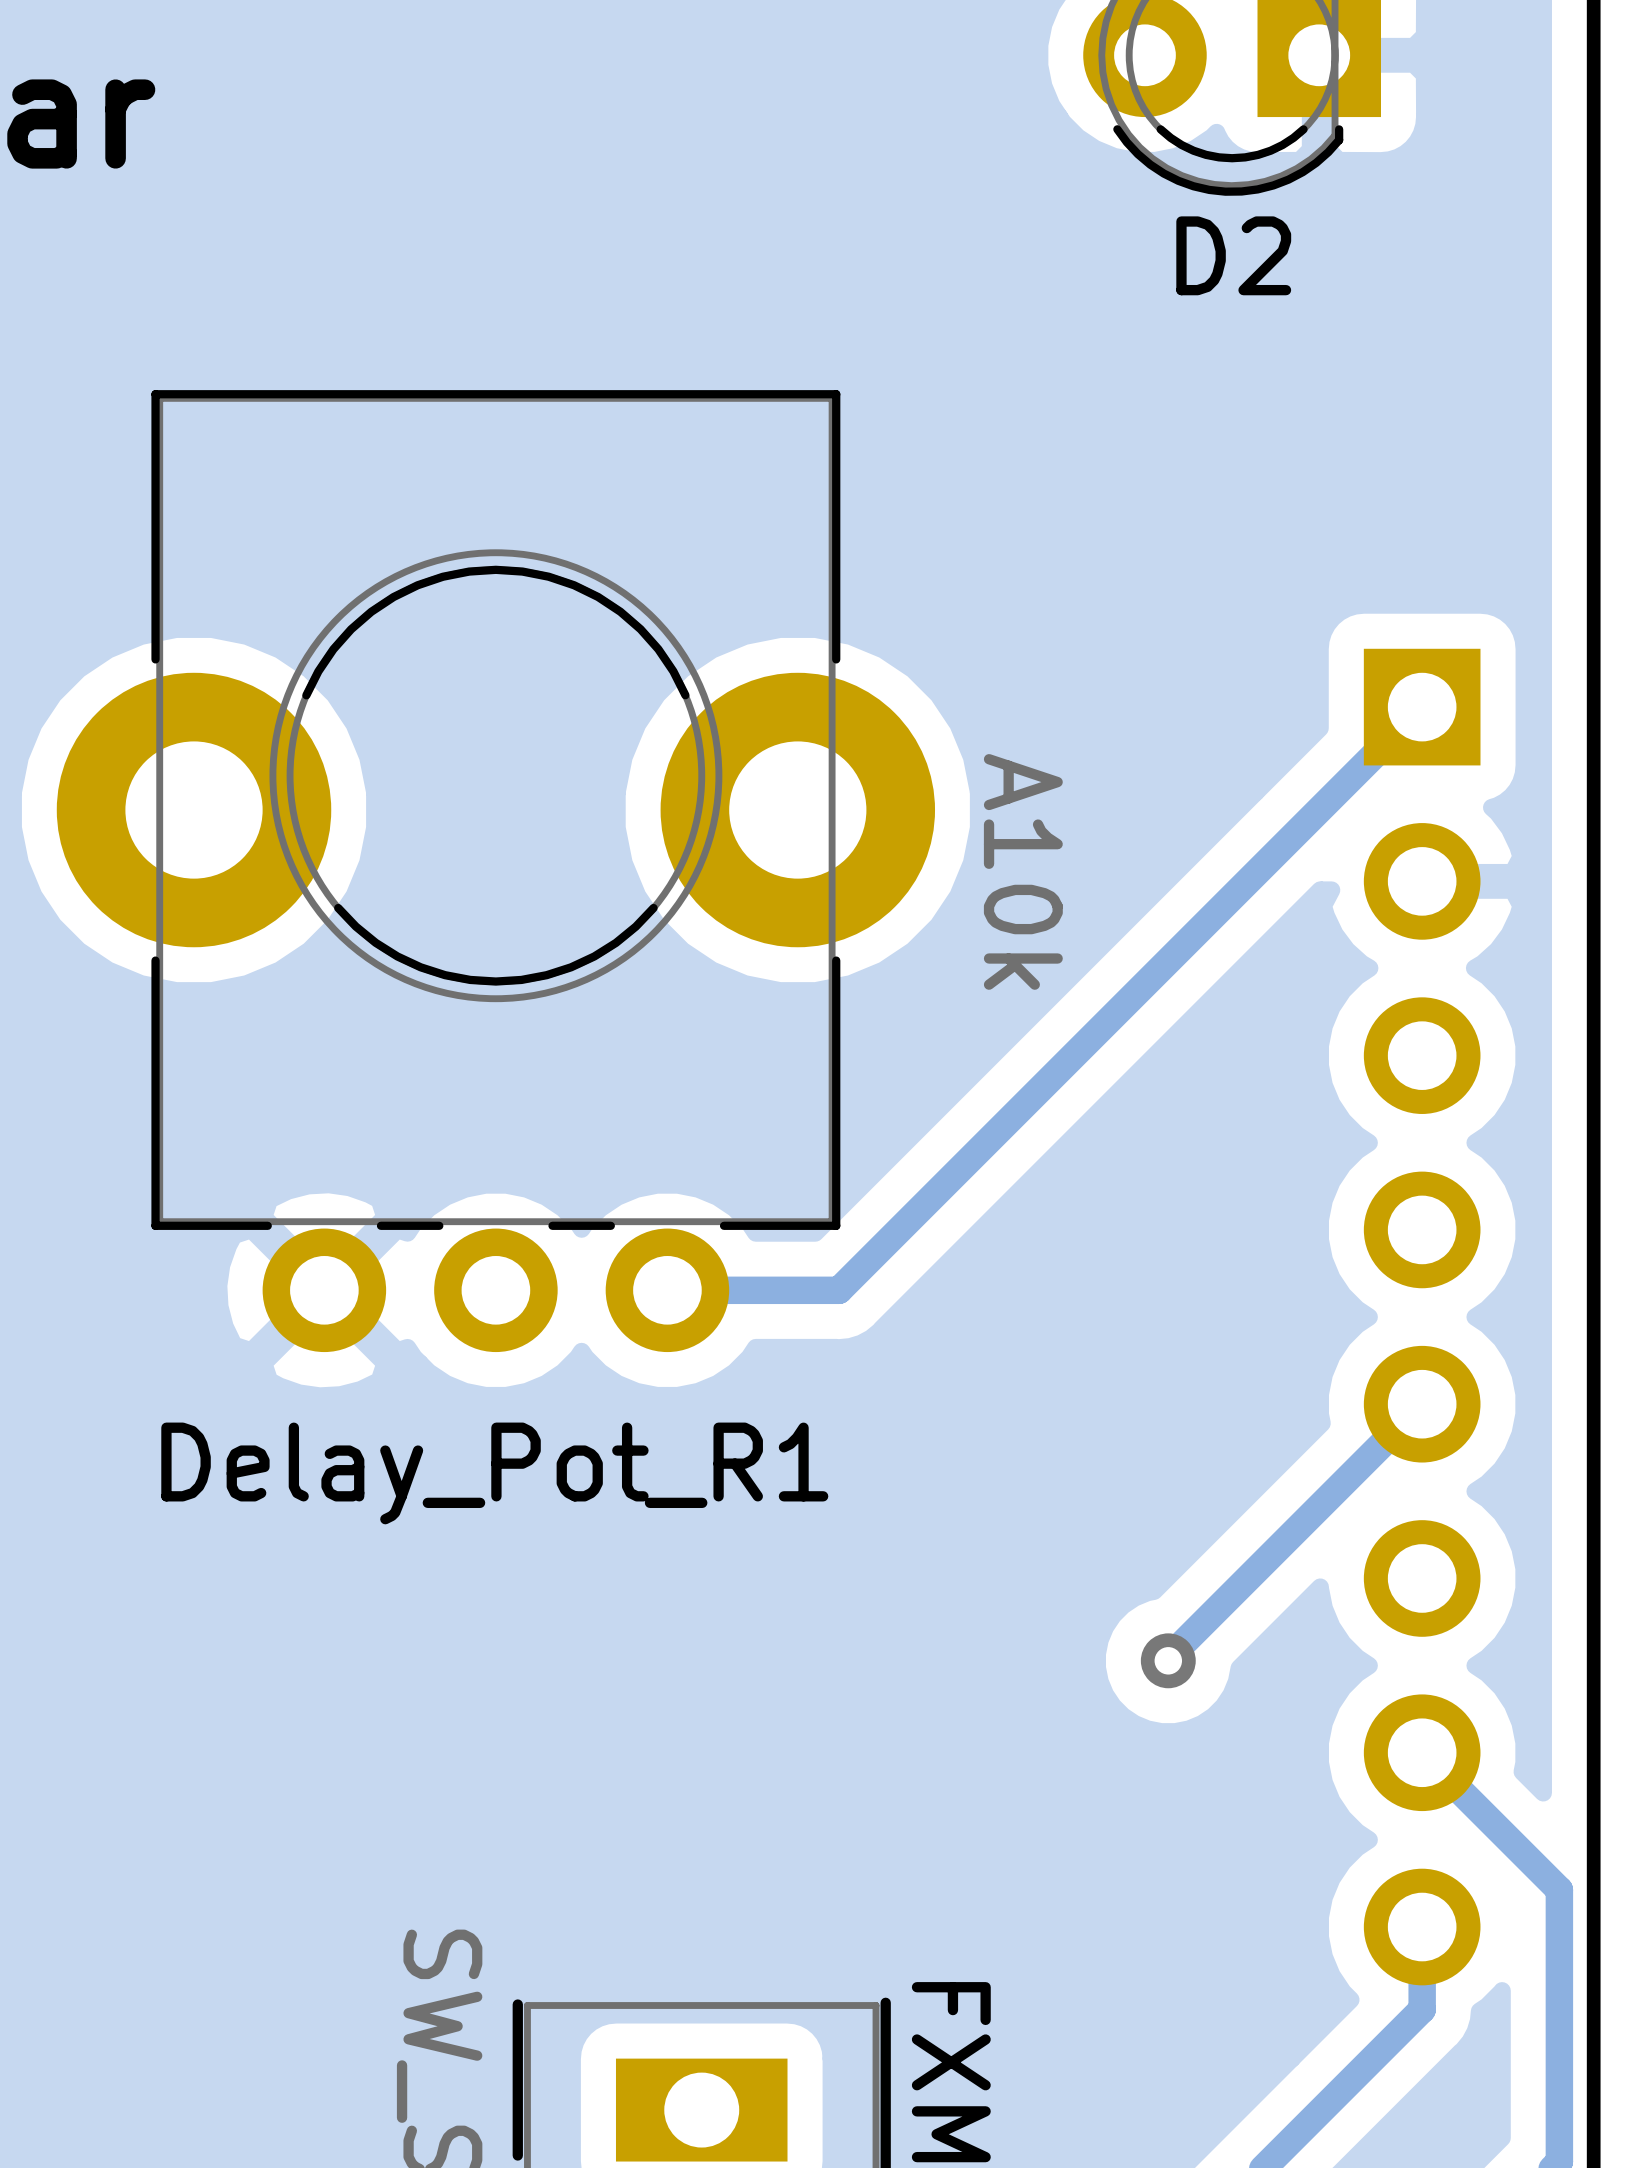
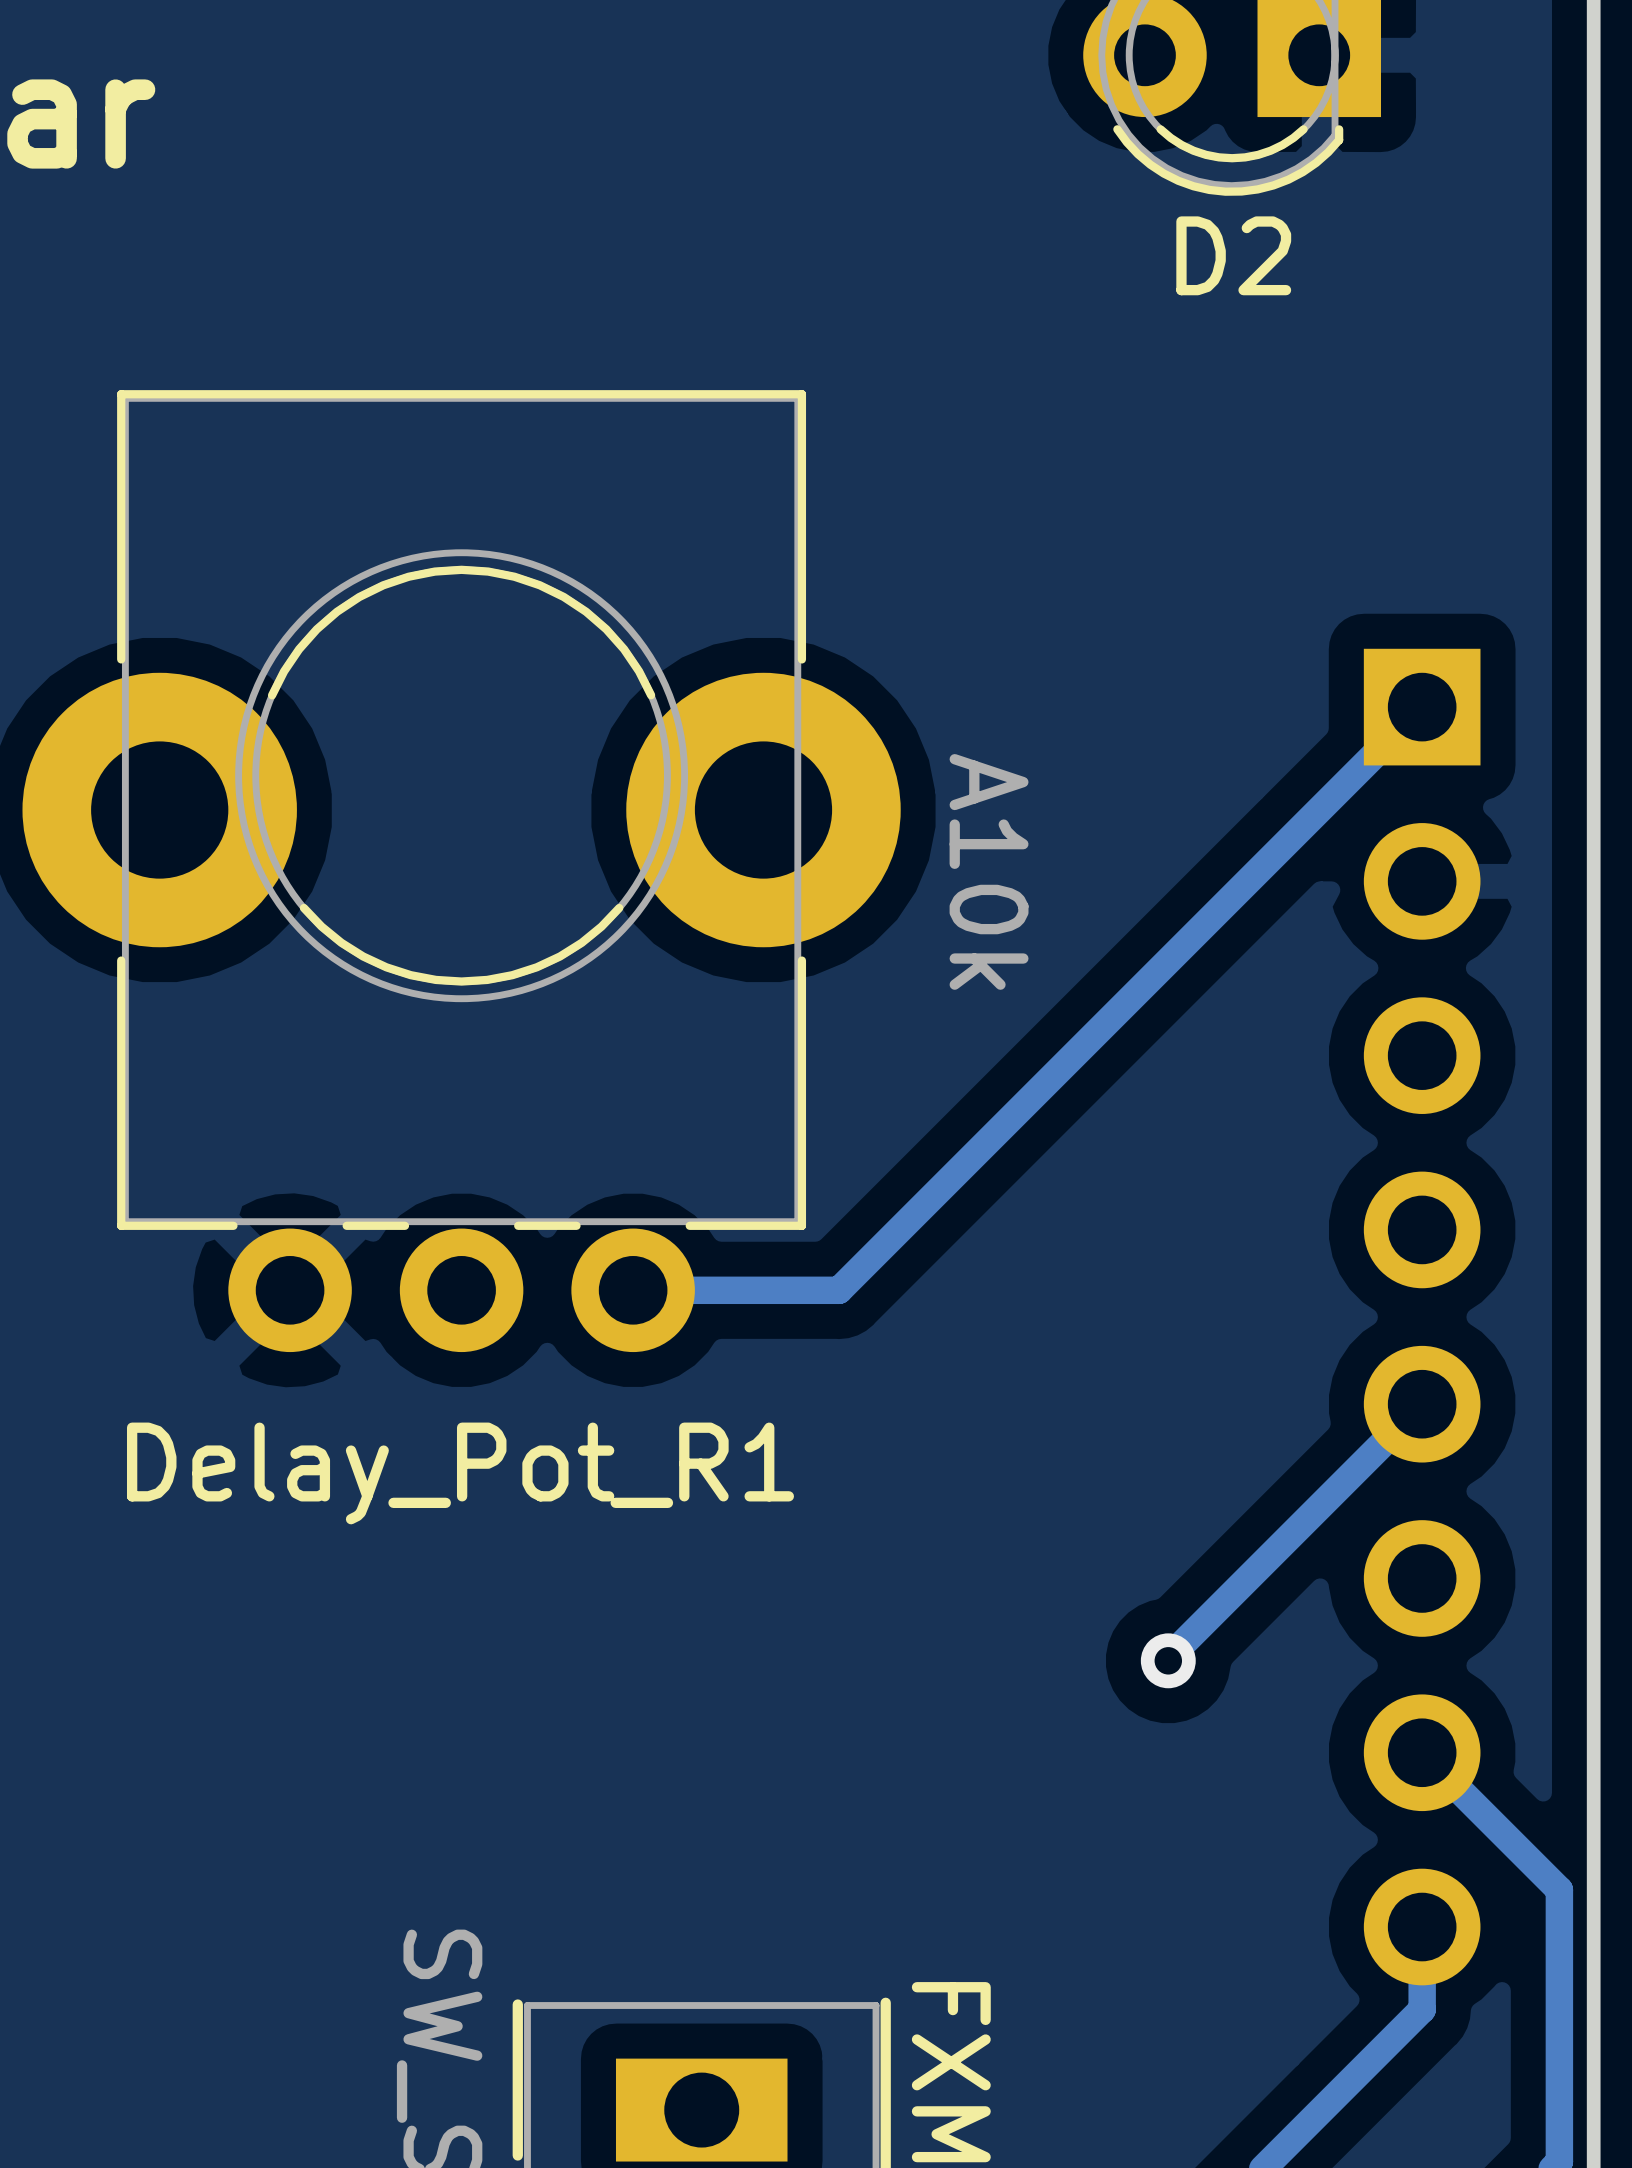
Delay_Pot_R1 position: (495, 871) -> (461, 871)

